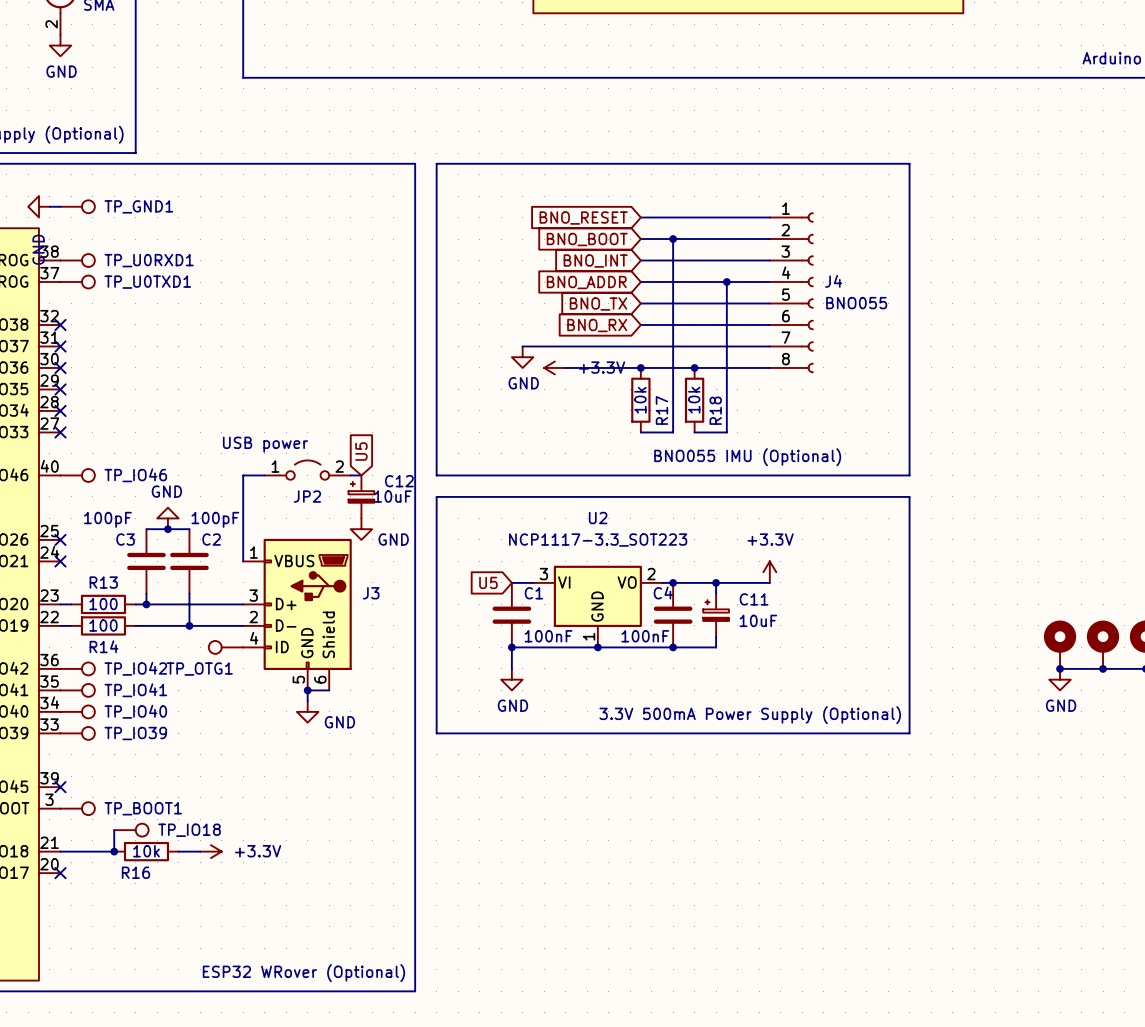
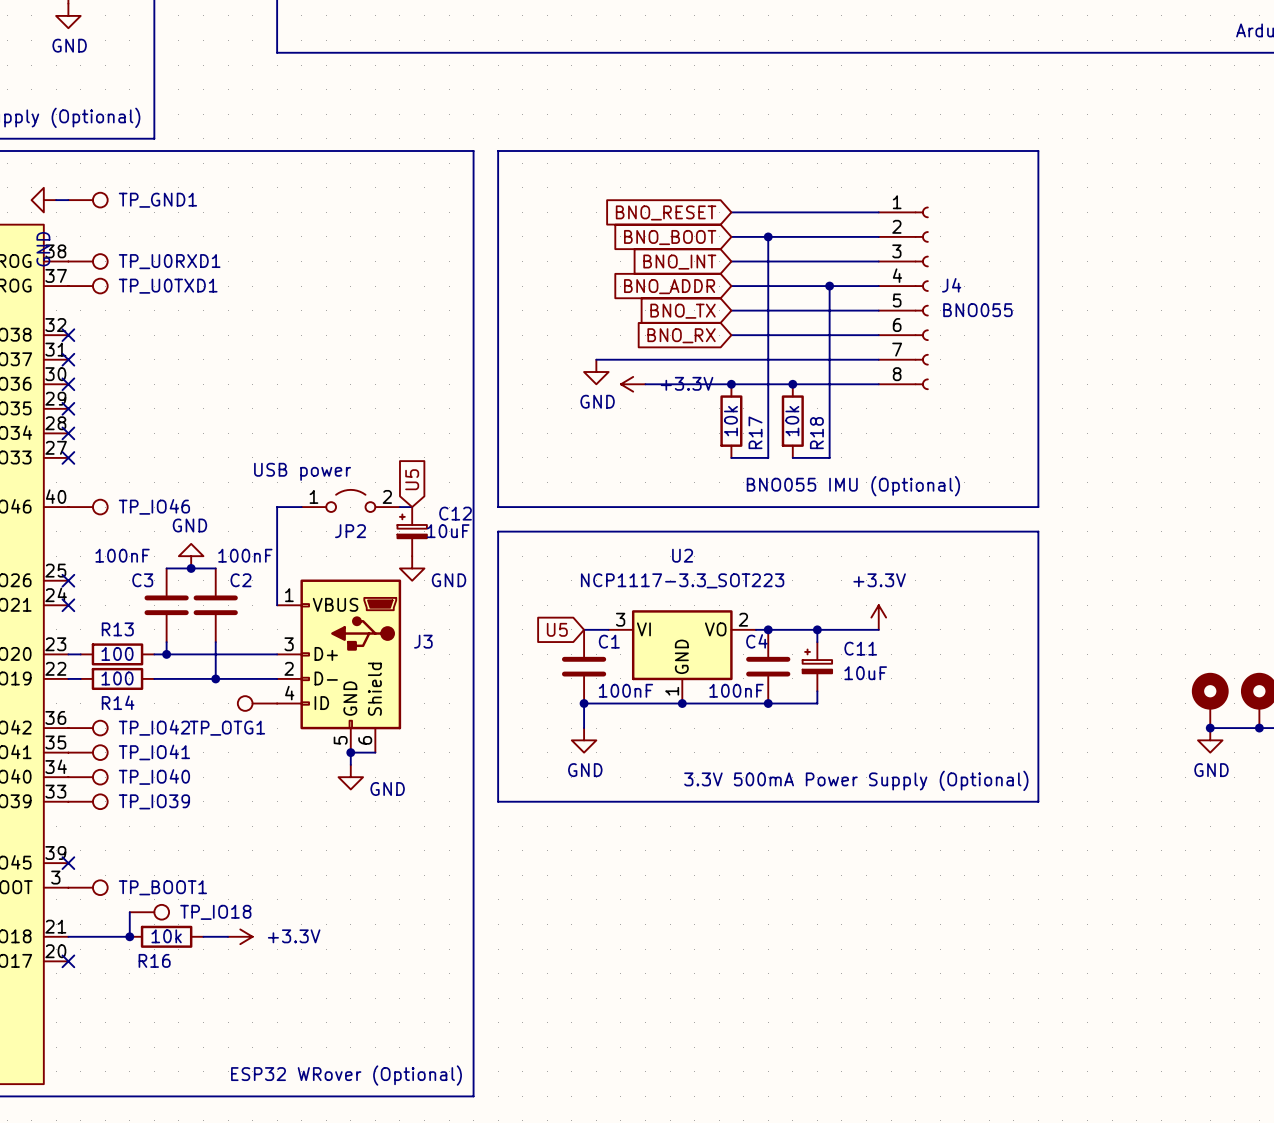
C3 value: 100pF (107, 519) -> 100nF (122, 555)
C2 value: 100pF (215, 519) -> 100nF (245, 555)

